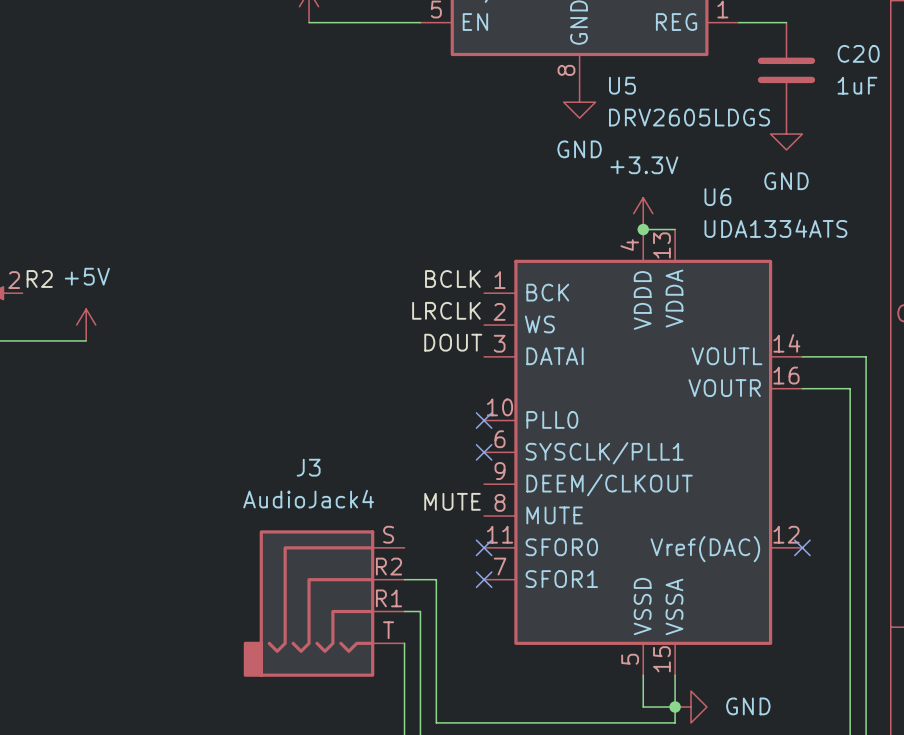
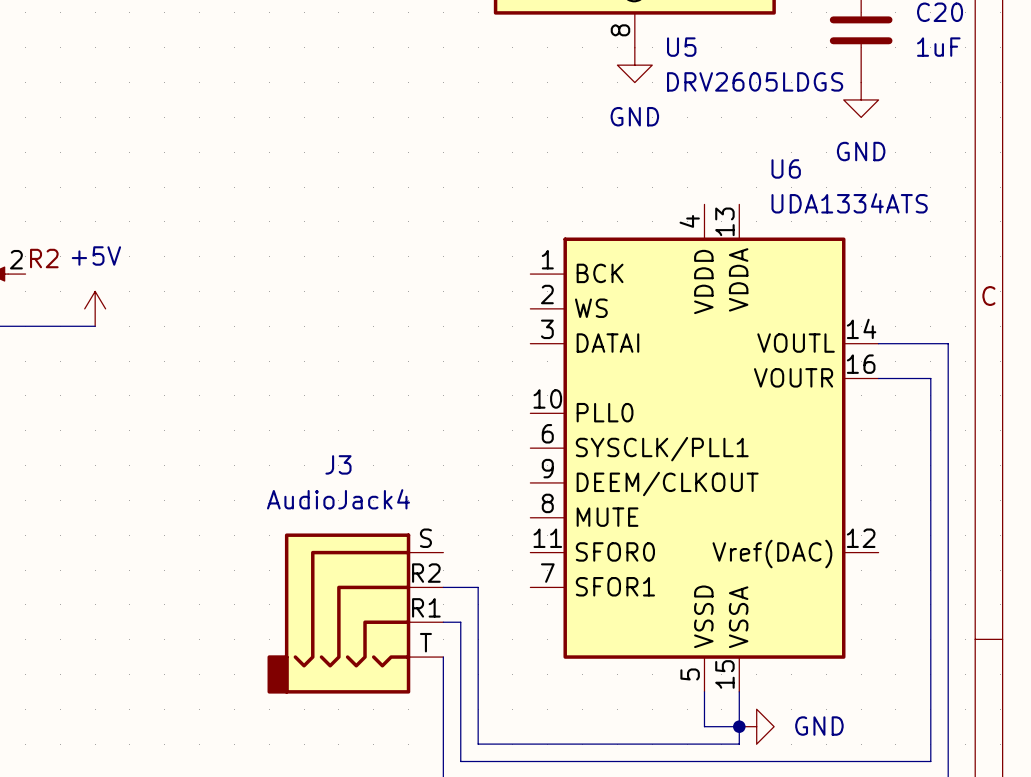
power symbol: +3.3V (643, 213) -> none
wire: (643, 229) (675, 229) -> none
junction: (643, 229) -> none
label: BCLK (452, 279) -> none
label: LRCLK (446, 310) -> none
label: DOUT (453, 342) -> none
no-connect mark: (484, 420) -> none
no-connect mark: (484, 452) -> none
label: MUTE (452, 501) -> none
no-connect mark: (484, 547) -> none
no-connect mark: (802, 547) -> none
no-connect mark: (484, 579) -> none

